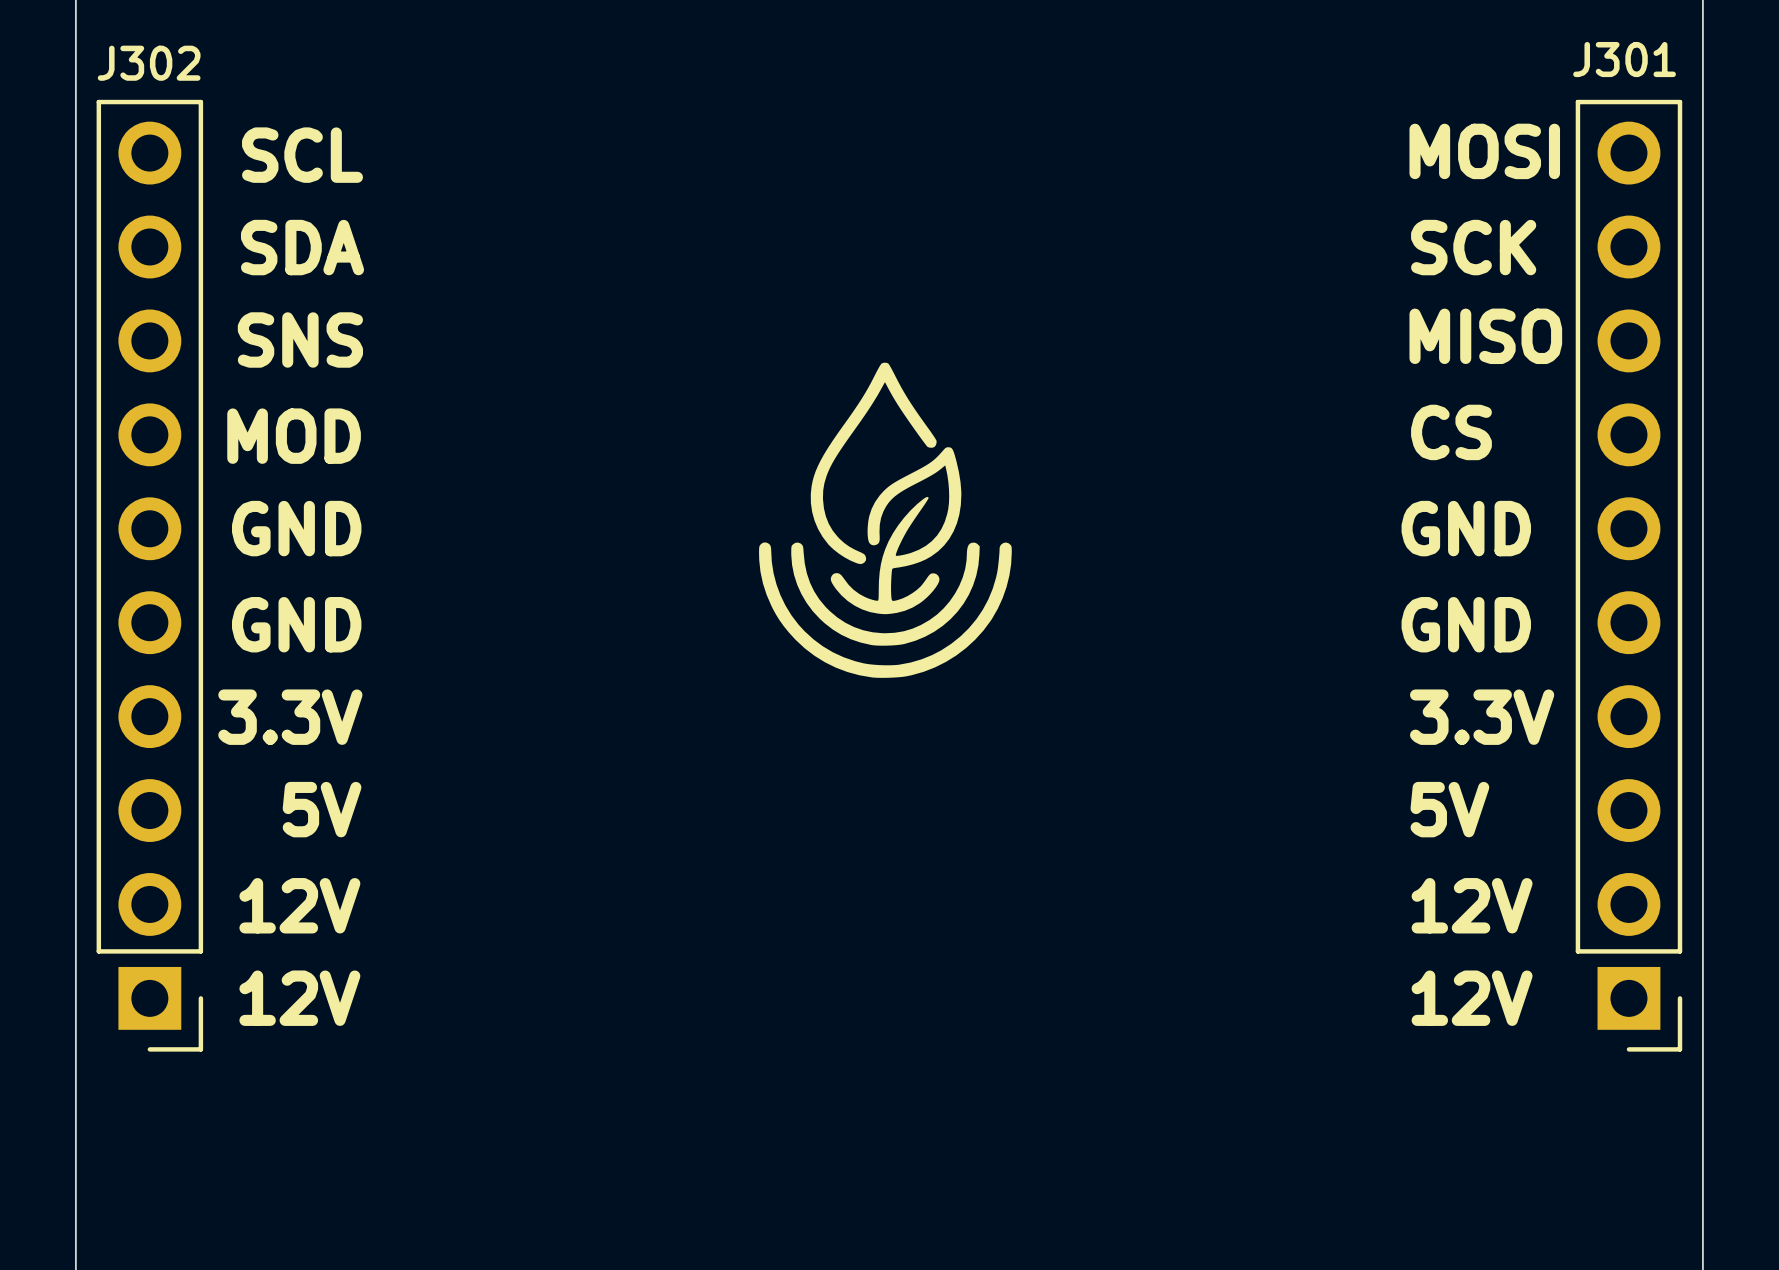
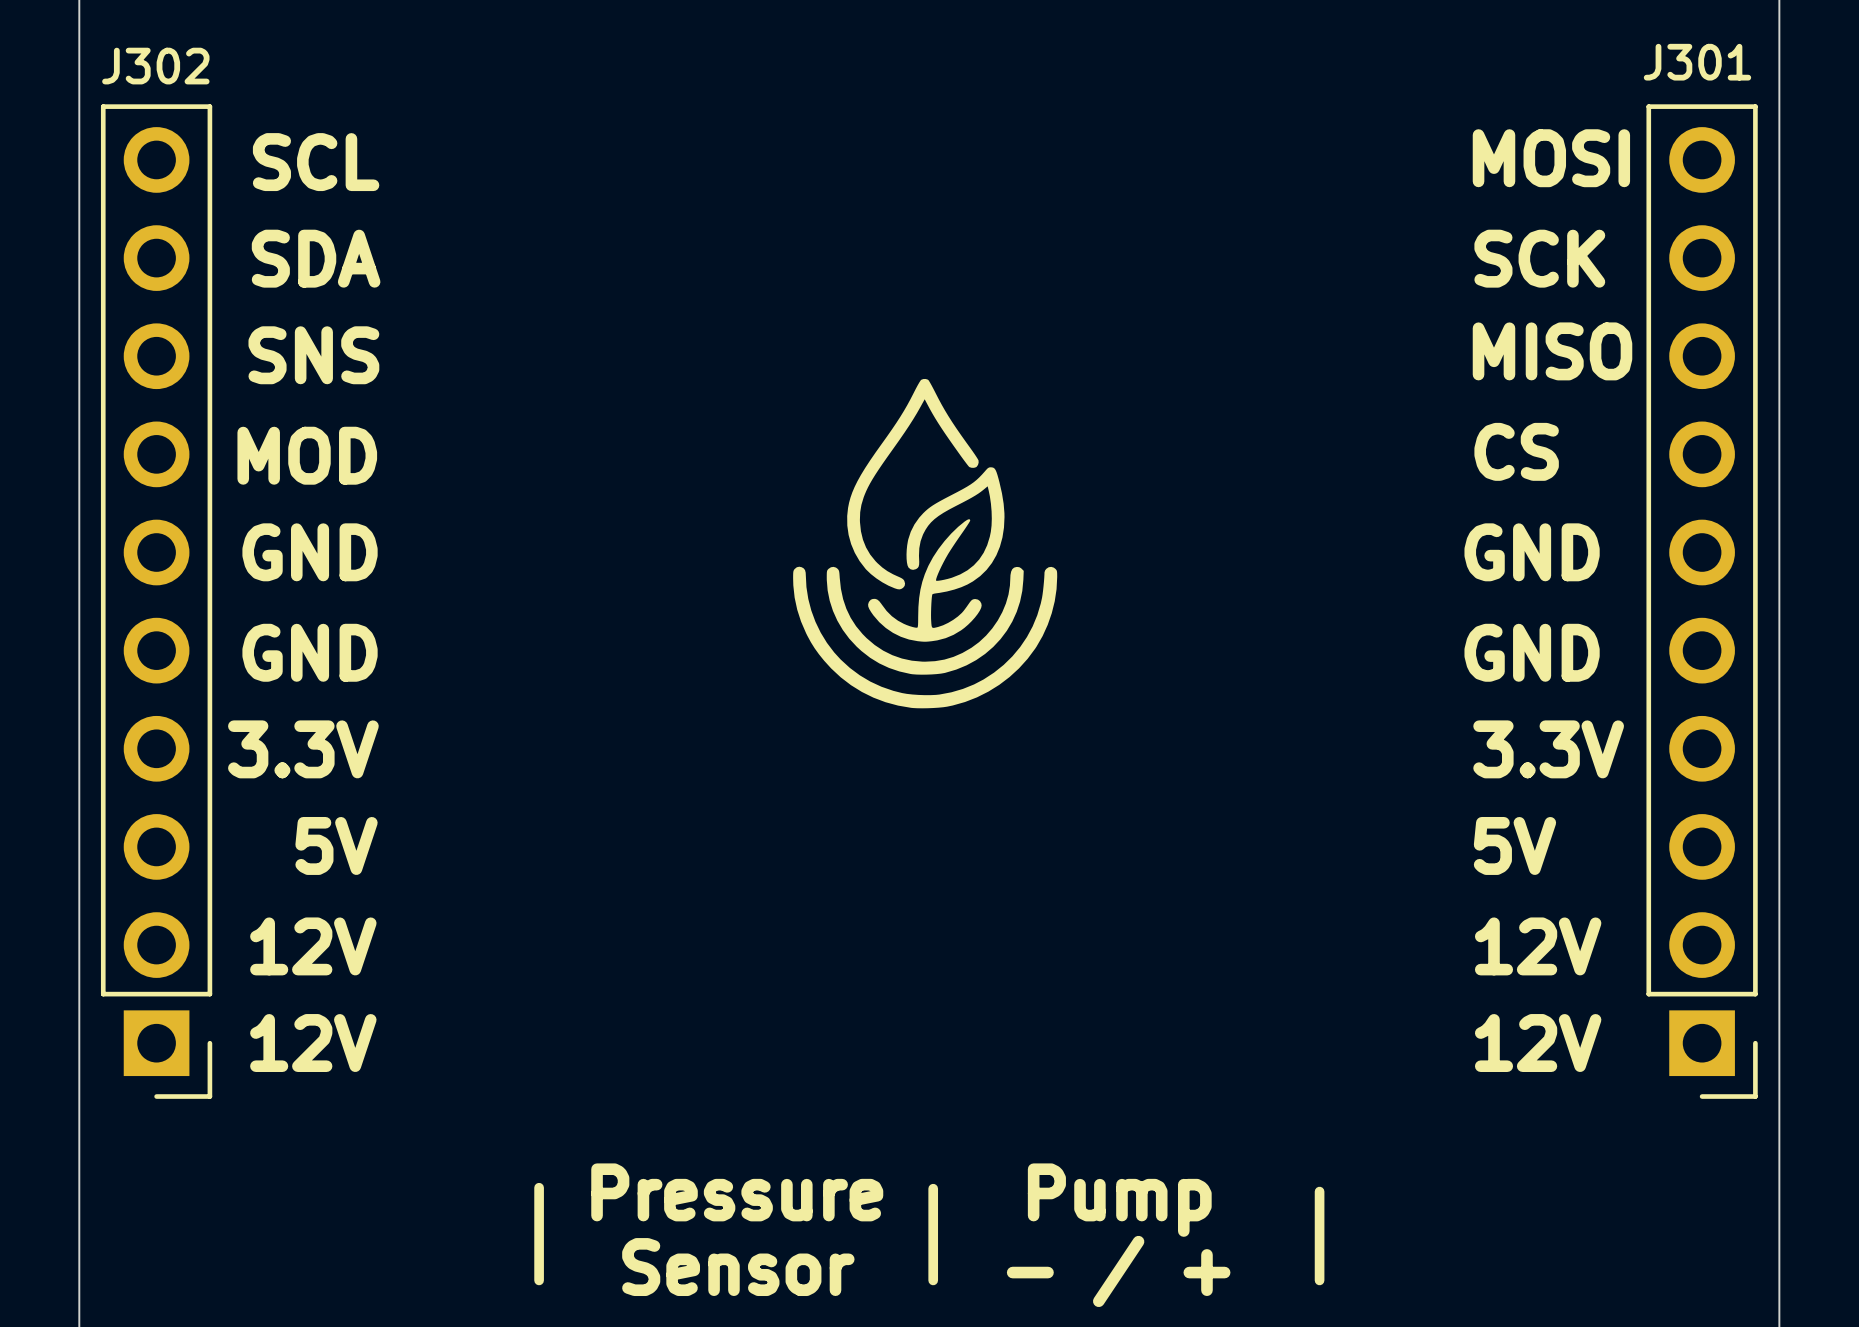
line: none -> (539, 1187) (539, 1280)
line: none -> (933, 1188) (933, 1280)
line: none -> (1319, 1191) (1319, 1280)
text: none -> Pressure (737, 1192)
text: none -> Pump (1119, 1200)
text: none -> Sensor (738, 1267)
text: none -> - / + (1118, 1271)

